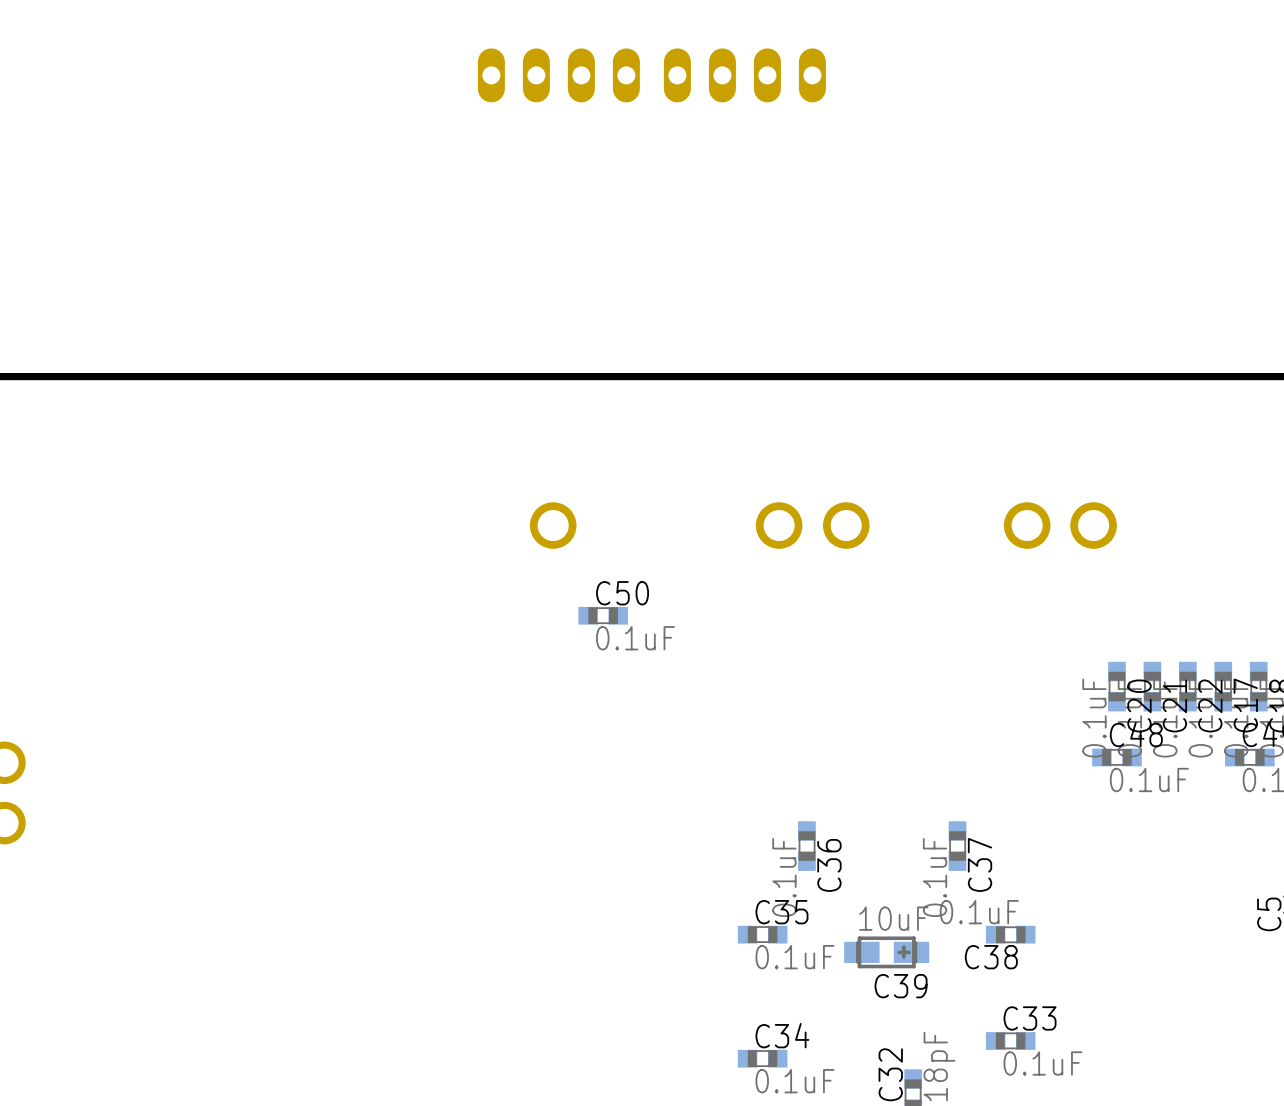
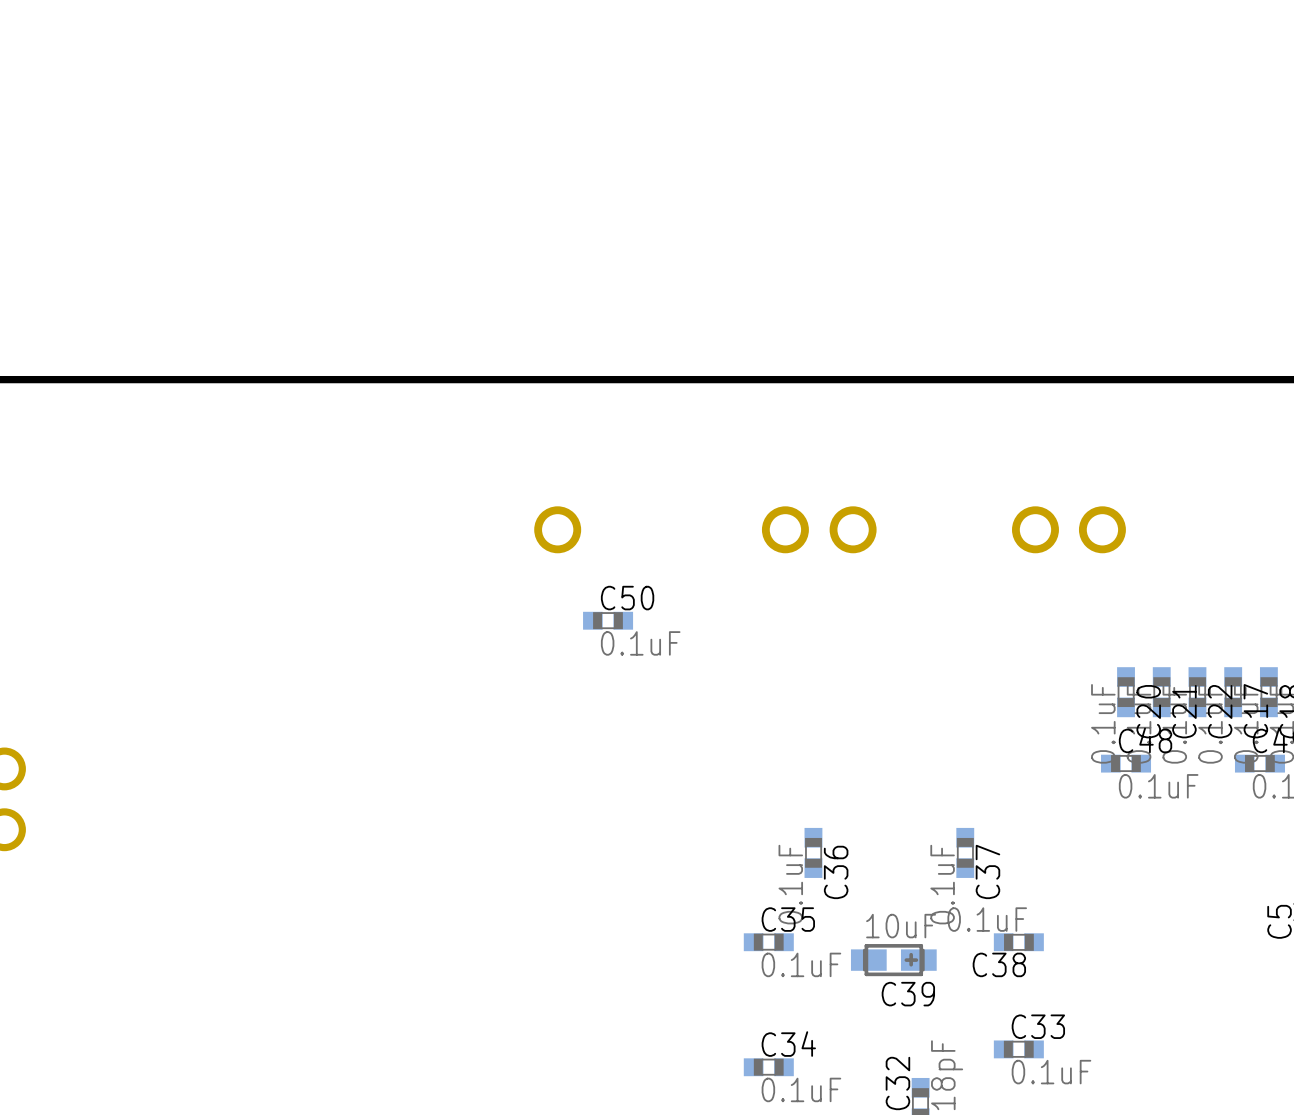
part: (558, 75) -> none
part: (744, 75) -> none

